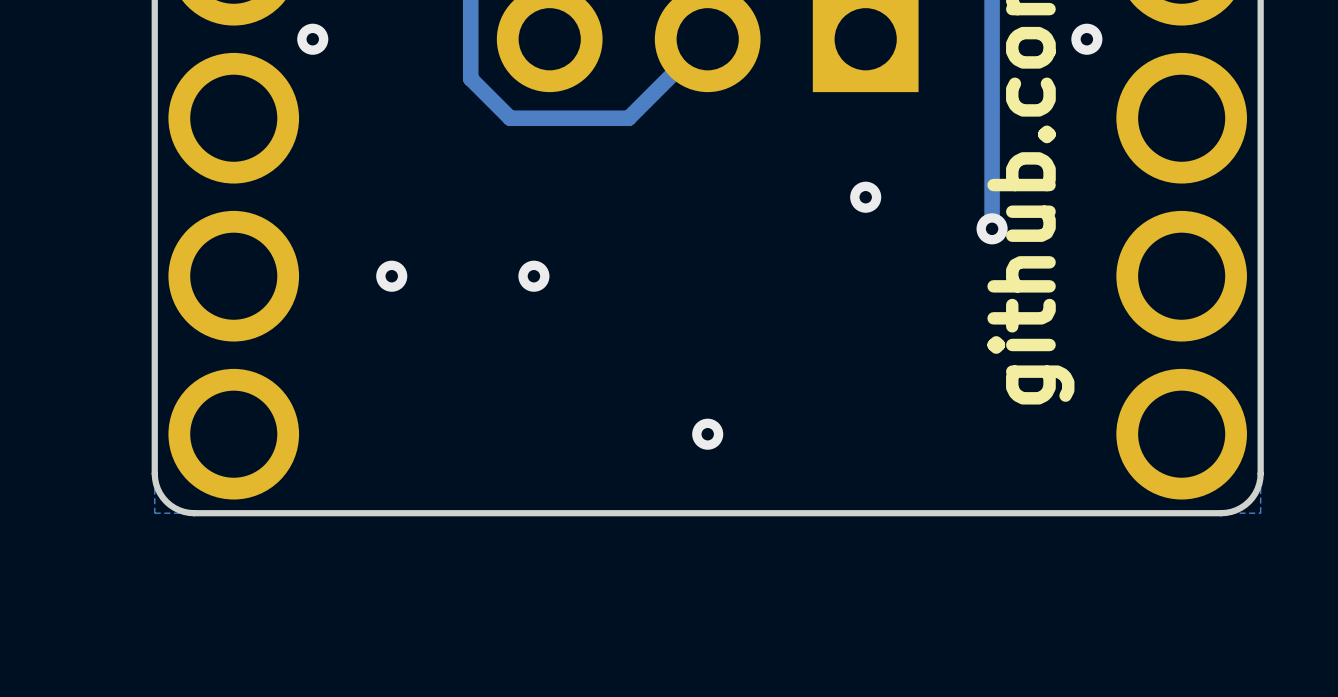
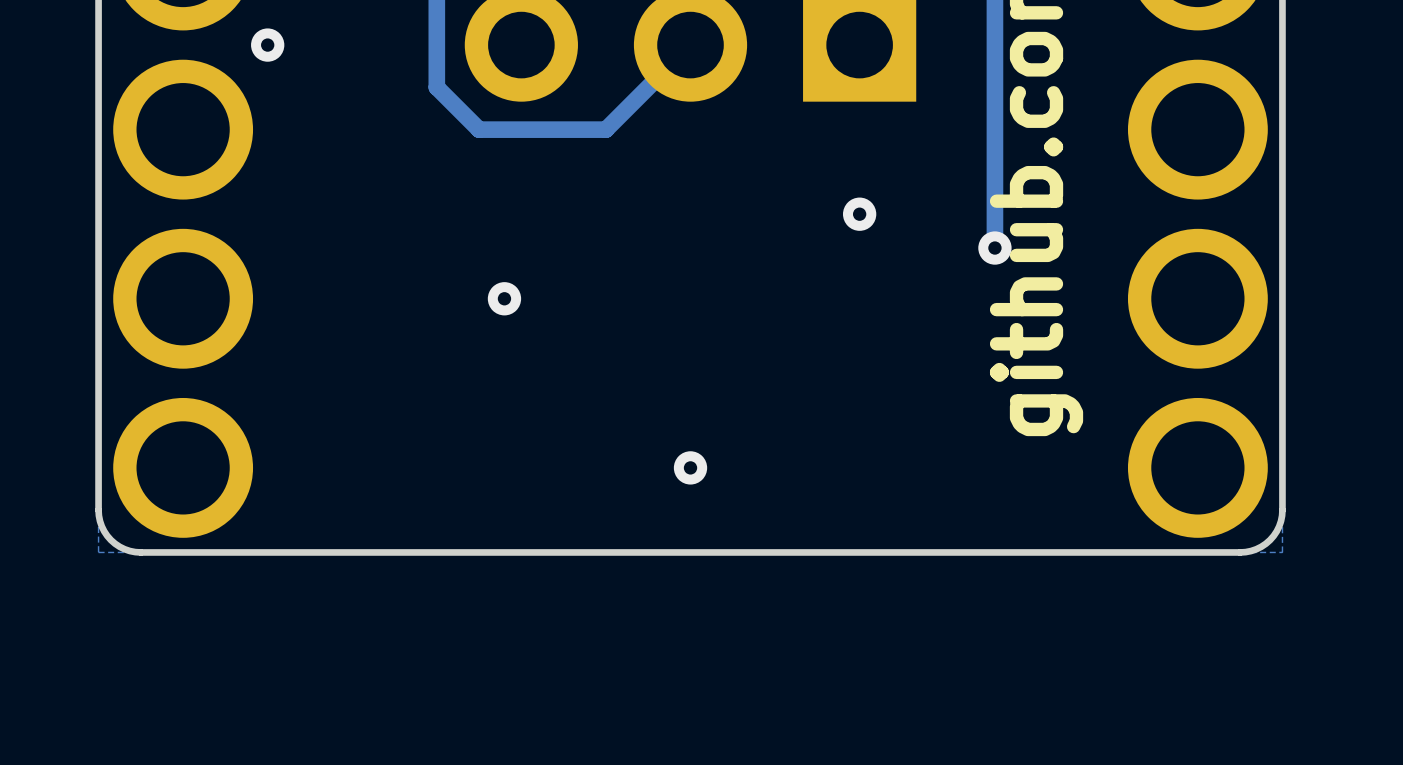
via: (1086, 39) -> none
via: (391, 276) -> none

